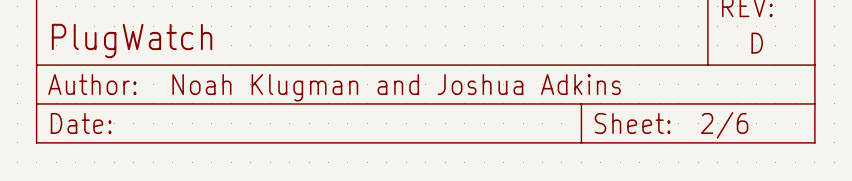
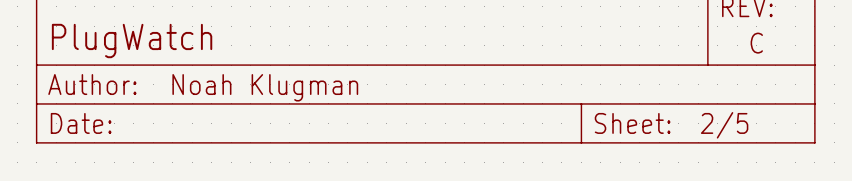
part text: D (757, 43) -> C (756, 43)
part text: Noah Klugman and Joshua Adkins (396, 87) -> Noah Klugman (265, 87)
part text: 2/6 (724, 125) -> 2/5 (724, 125)

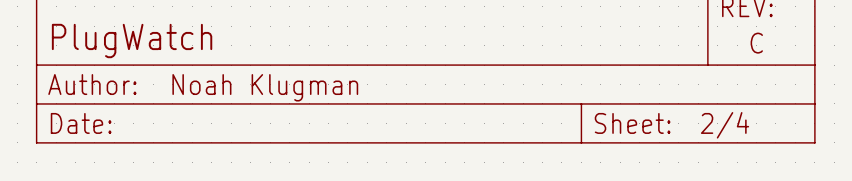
part text: 2/5 (724, 125) -> 2/4 (725, 125)

